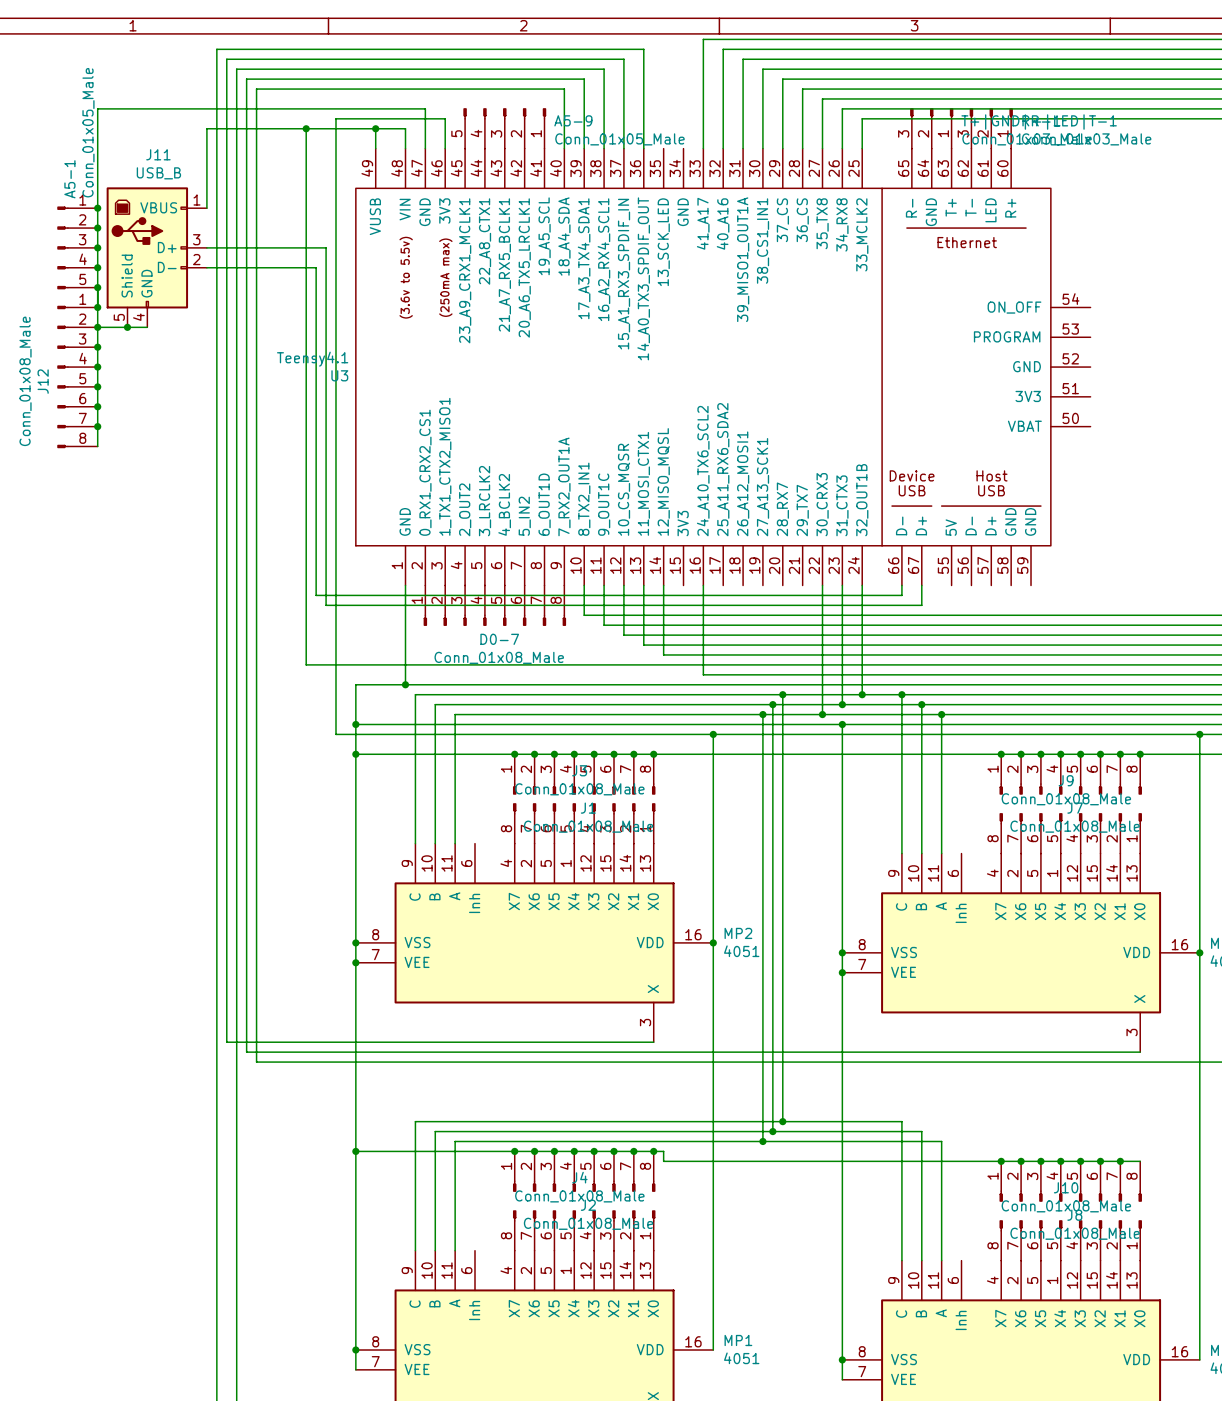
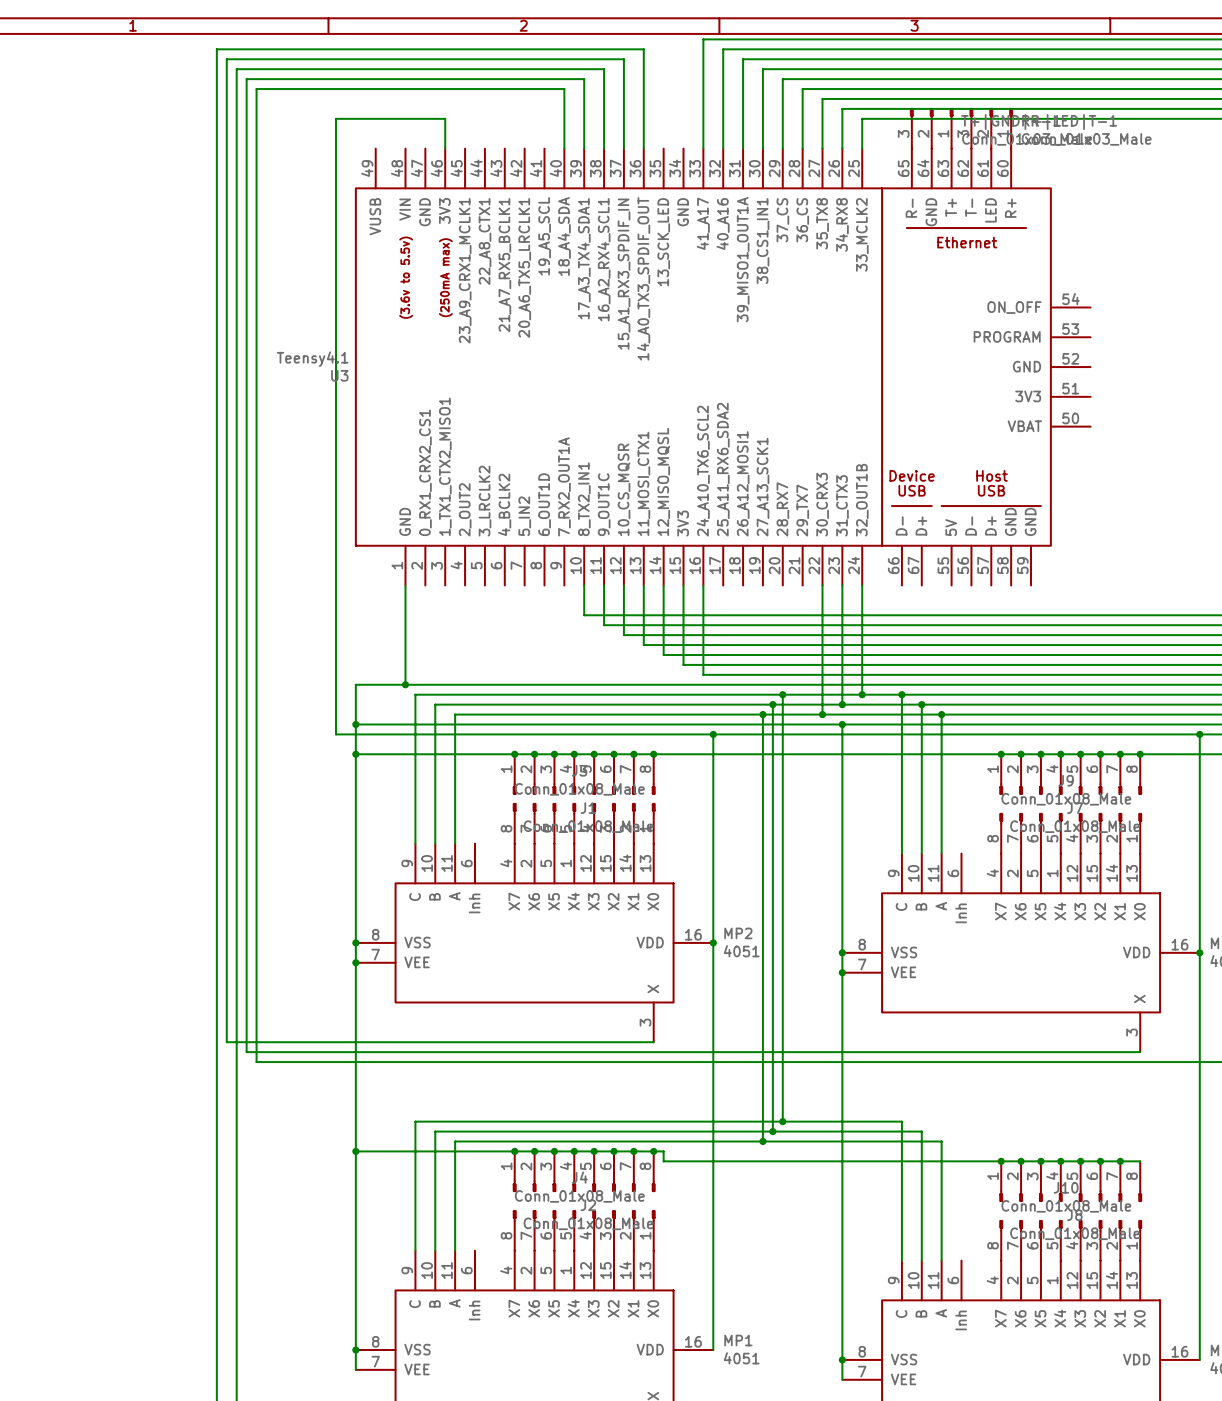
wire: (306, 128) (306, 664) (683, 664) -> (683, 585) (683, 664)
junction: (306, 128) -> none
wire: (375, 128) (375, 148) -> none
junction: (375, 128) -> none
A5-9: Conn_01x05_Male (504, 128) -> none
wire: (405, 148) (405, 128) (206, 128) (206, 208) -> none
wire: (425, 148) (425, 108) (97, 108) (97, 446) -> none
junction: (97, 208) -> none
junction: (97, 228) -> none
A5-1: Conn_01x05_Male (77, 247) -> none
junction: (97, 247) -> none
wire: (206, 247) (326, 247) (326, 605) (921, 605) (921, 585) -> none
J11: USB_B (156, 257) -> none
junction: (97, 267) -> none
wire: (206, 267) (316, 267) (316, 595) (901, 595) (901, 585) -> none
junction: (97, 287) -> none
junction: (97, 307) -> none
wire: (97, 327) (147, 327) -> none
junction: (97, 327) -> none
junction: (127, 327) -> none
junction: (97, 347) -> none
junction: (97, 367) -> none
J12: Conn_01x08_Male (77, 376) -> none
junction: (97, 386) -> none
junction: (97, 406) -> none
junction: (97, 426) -> none
D0-7: Conn_01x08_Male (494, 605) -> none

